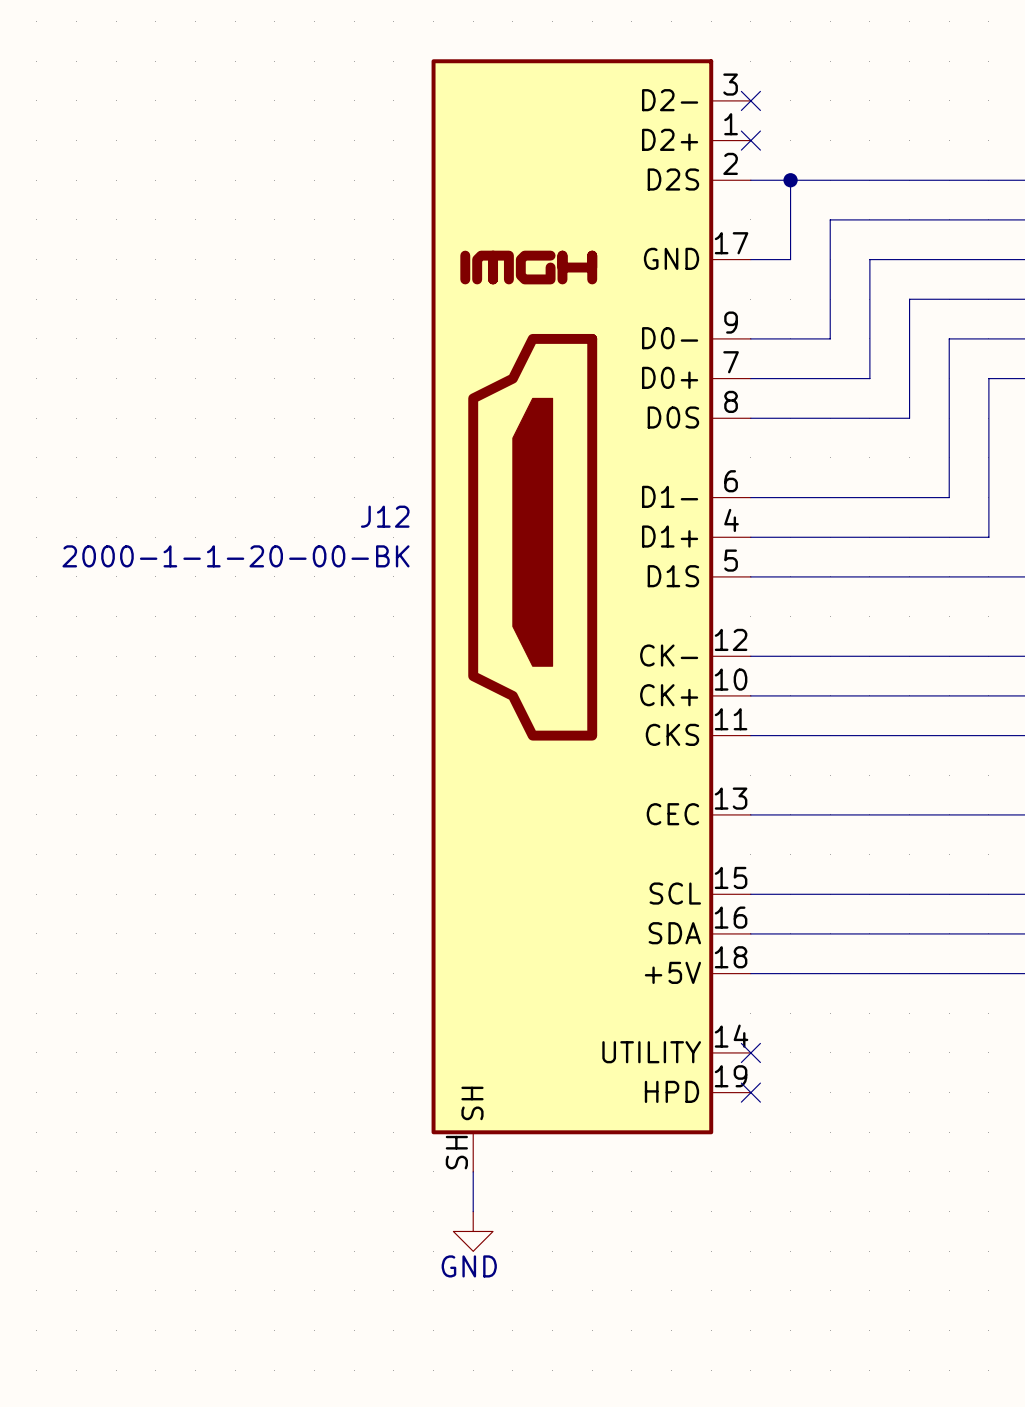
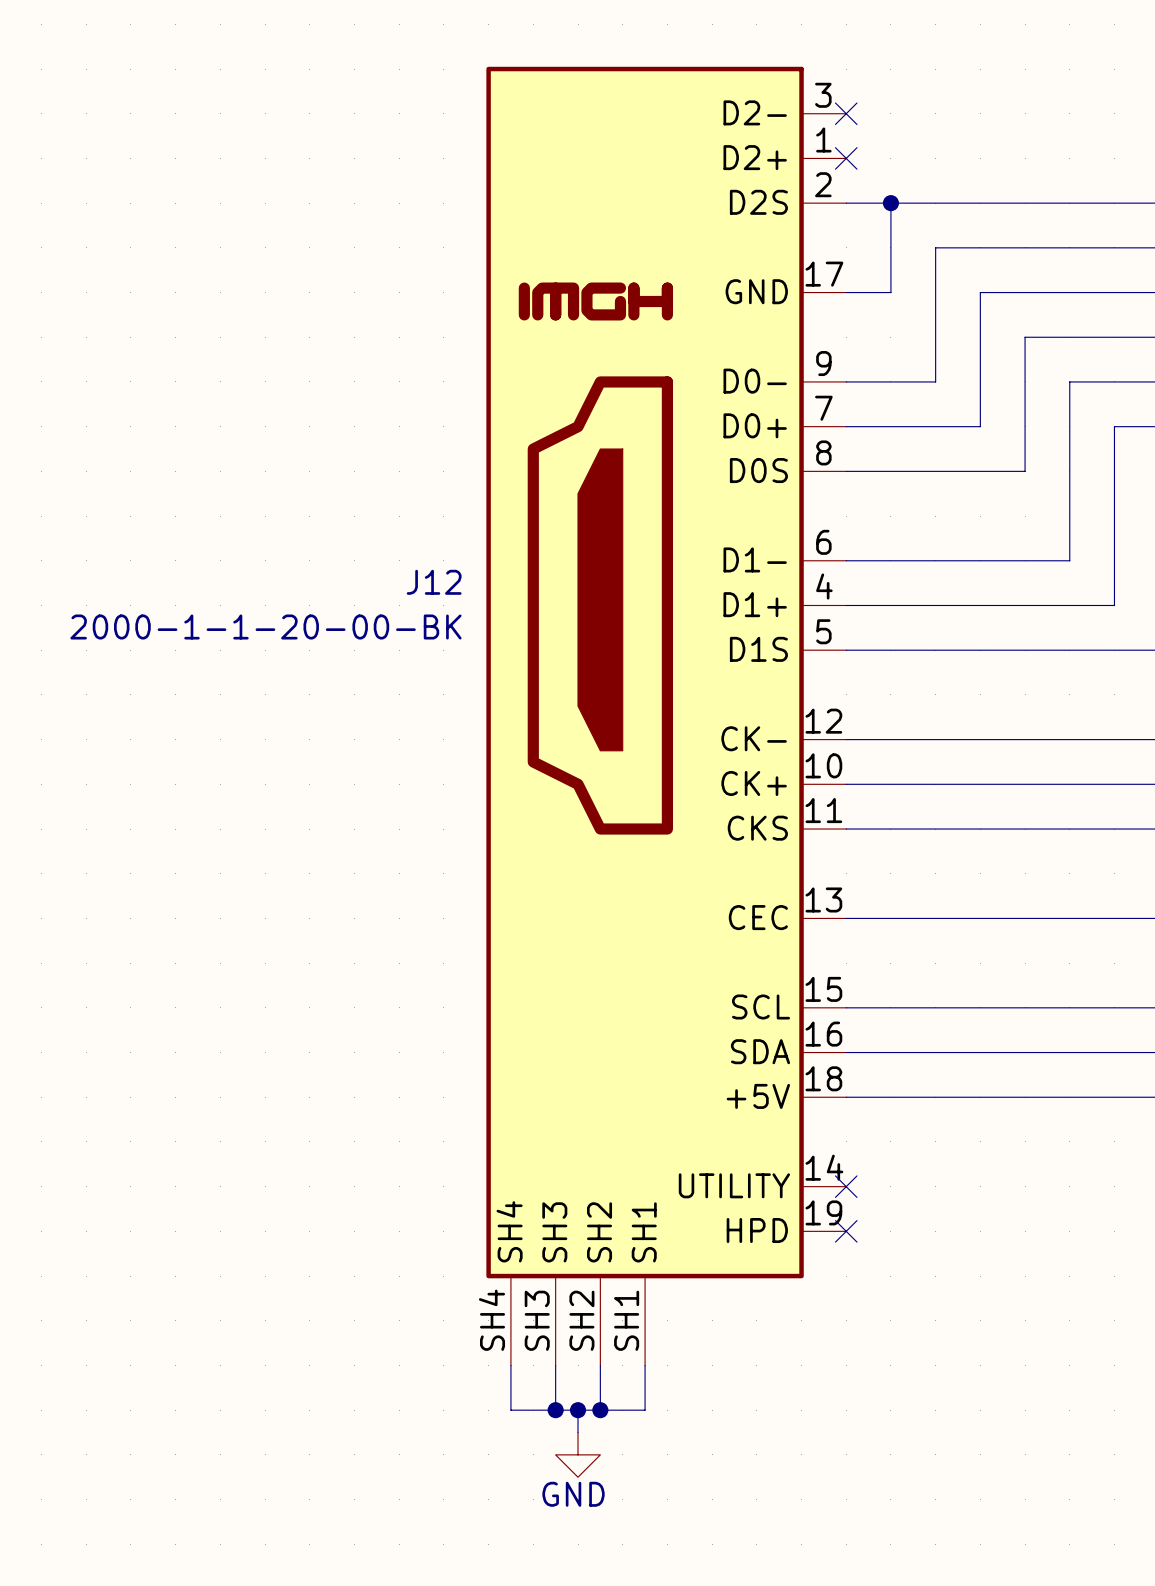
J12 symbol: [431, 59, 751, 1172] -> [486, 66, 847, 1366]
wire: (473, 1171) (473, 1211) -> (555, 1365) (555, 1410)
wire: none -> (510, 1365) (510, 1410) (645, 1410) (645, 1365)
wire: none -> (600, 1365) (600, 1410)
power symbol position: GND (473, 1231) -> GND (578, 1454)
junction: none -> (555, 1410)
wire: none -> (578, 1410) (578, 1432)
junction: none -> (578, 1410)
junction: none -> (600, 1410)

